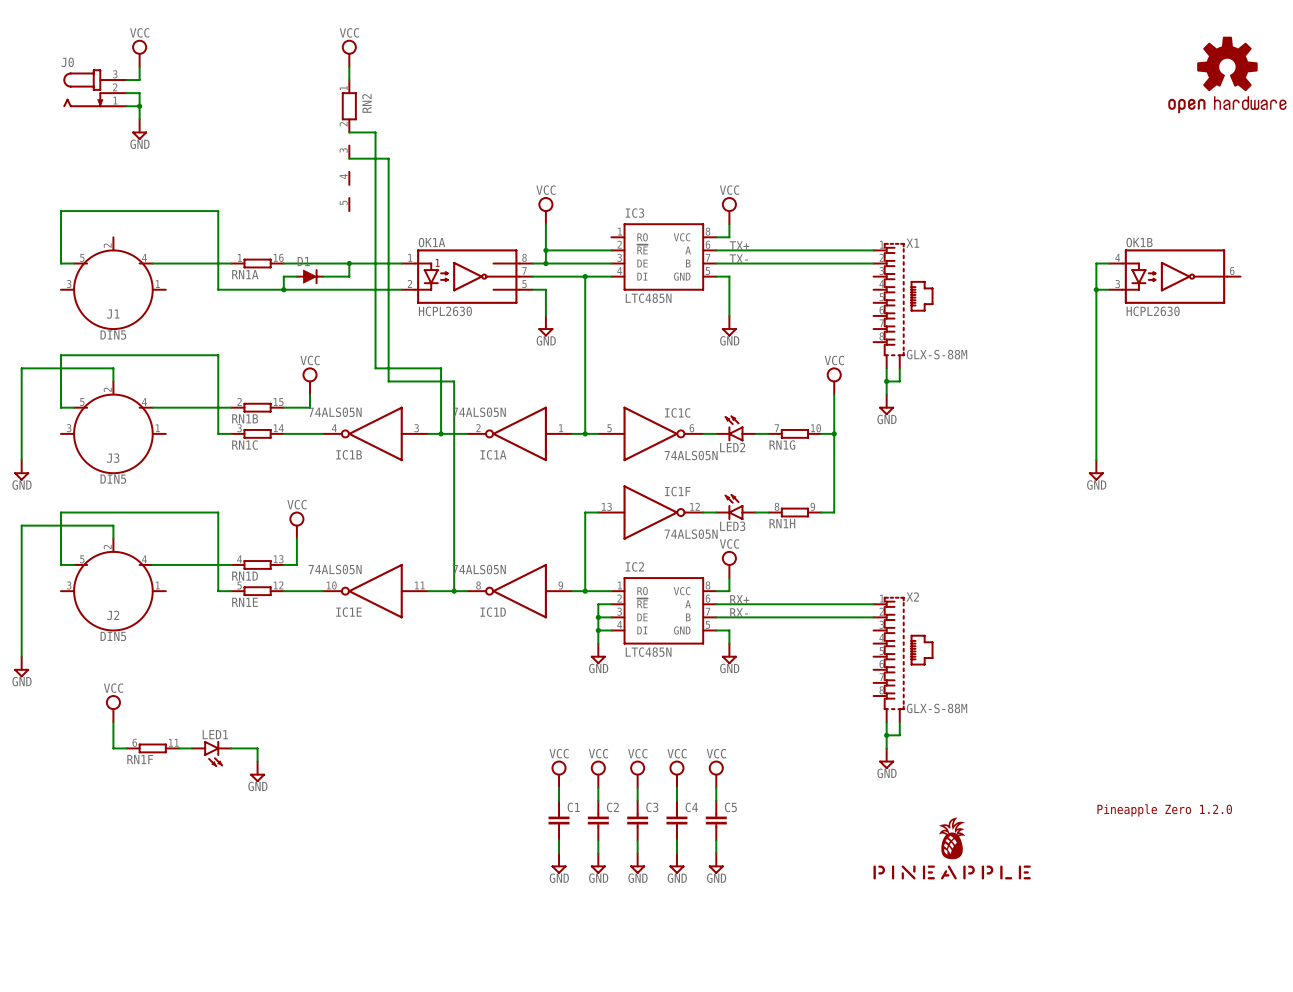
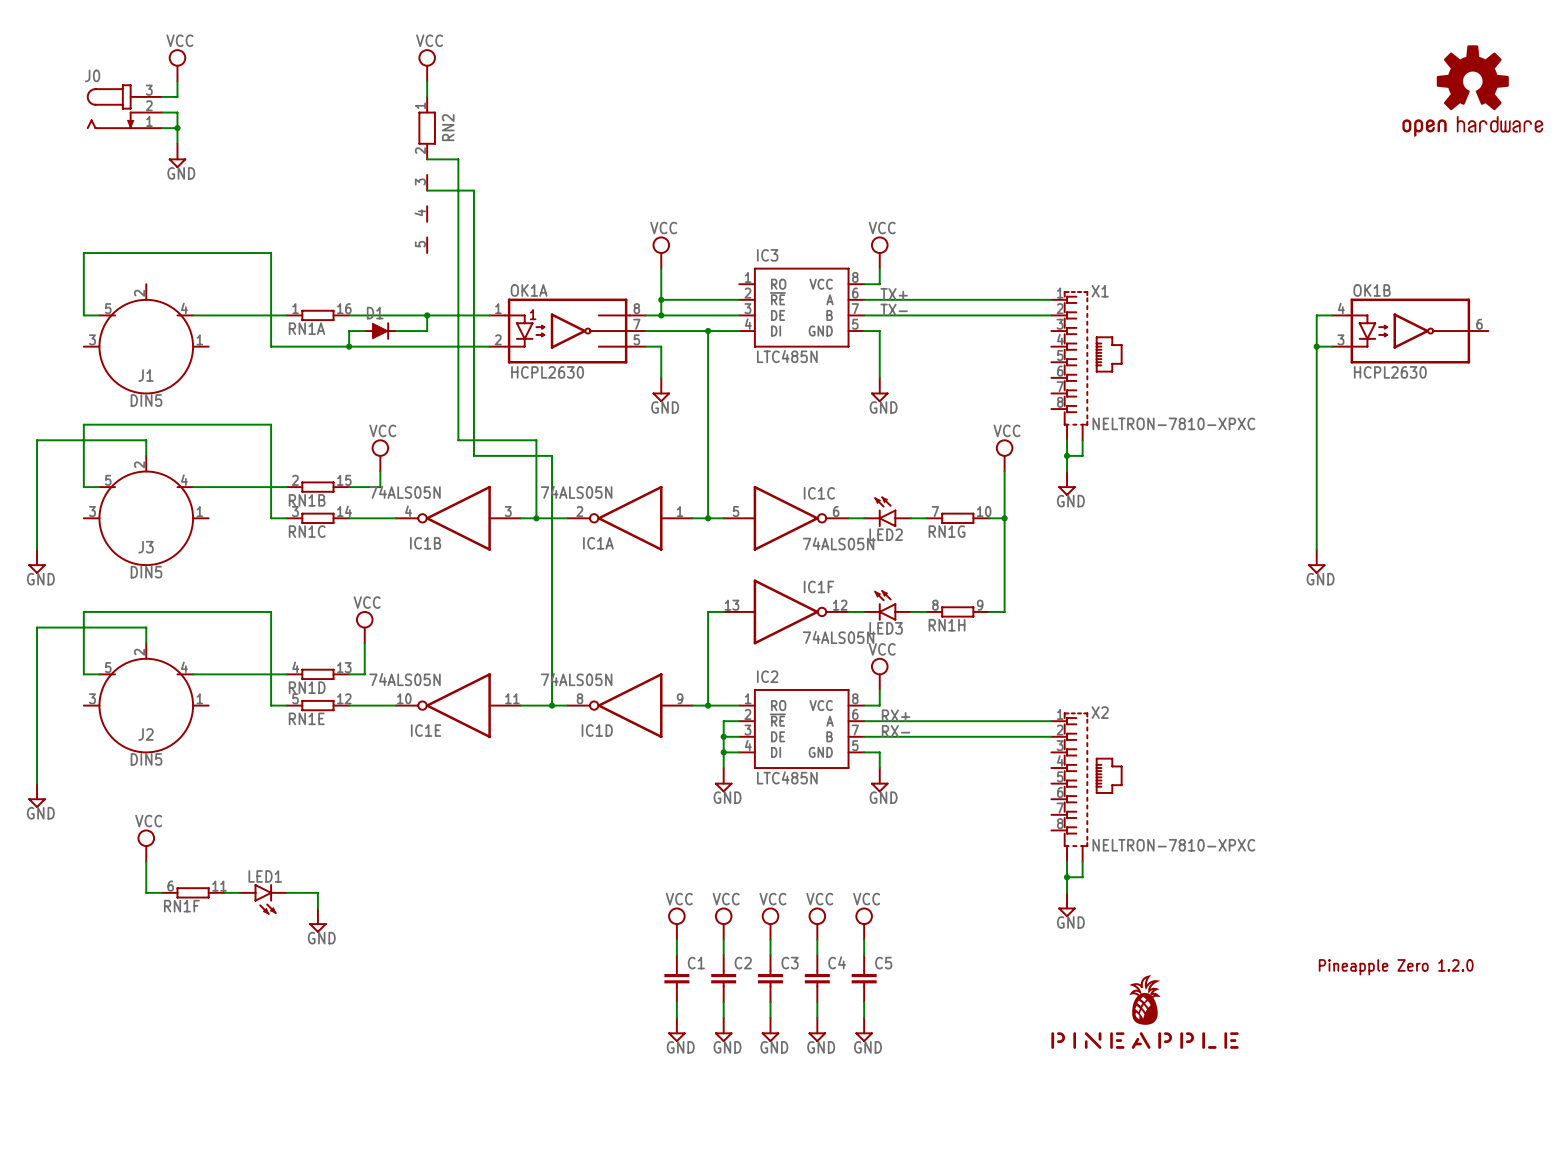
X1 value: GLX-S-88M (937, 354) -> NELTRON-7810-XPXC (1173, 423)
X2 value: GLX-S-88M (937, 708) -> NELTRON-7810-XPXC (1173, 845)

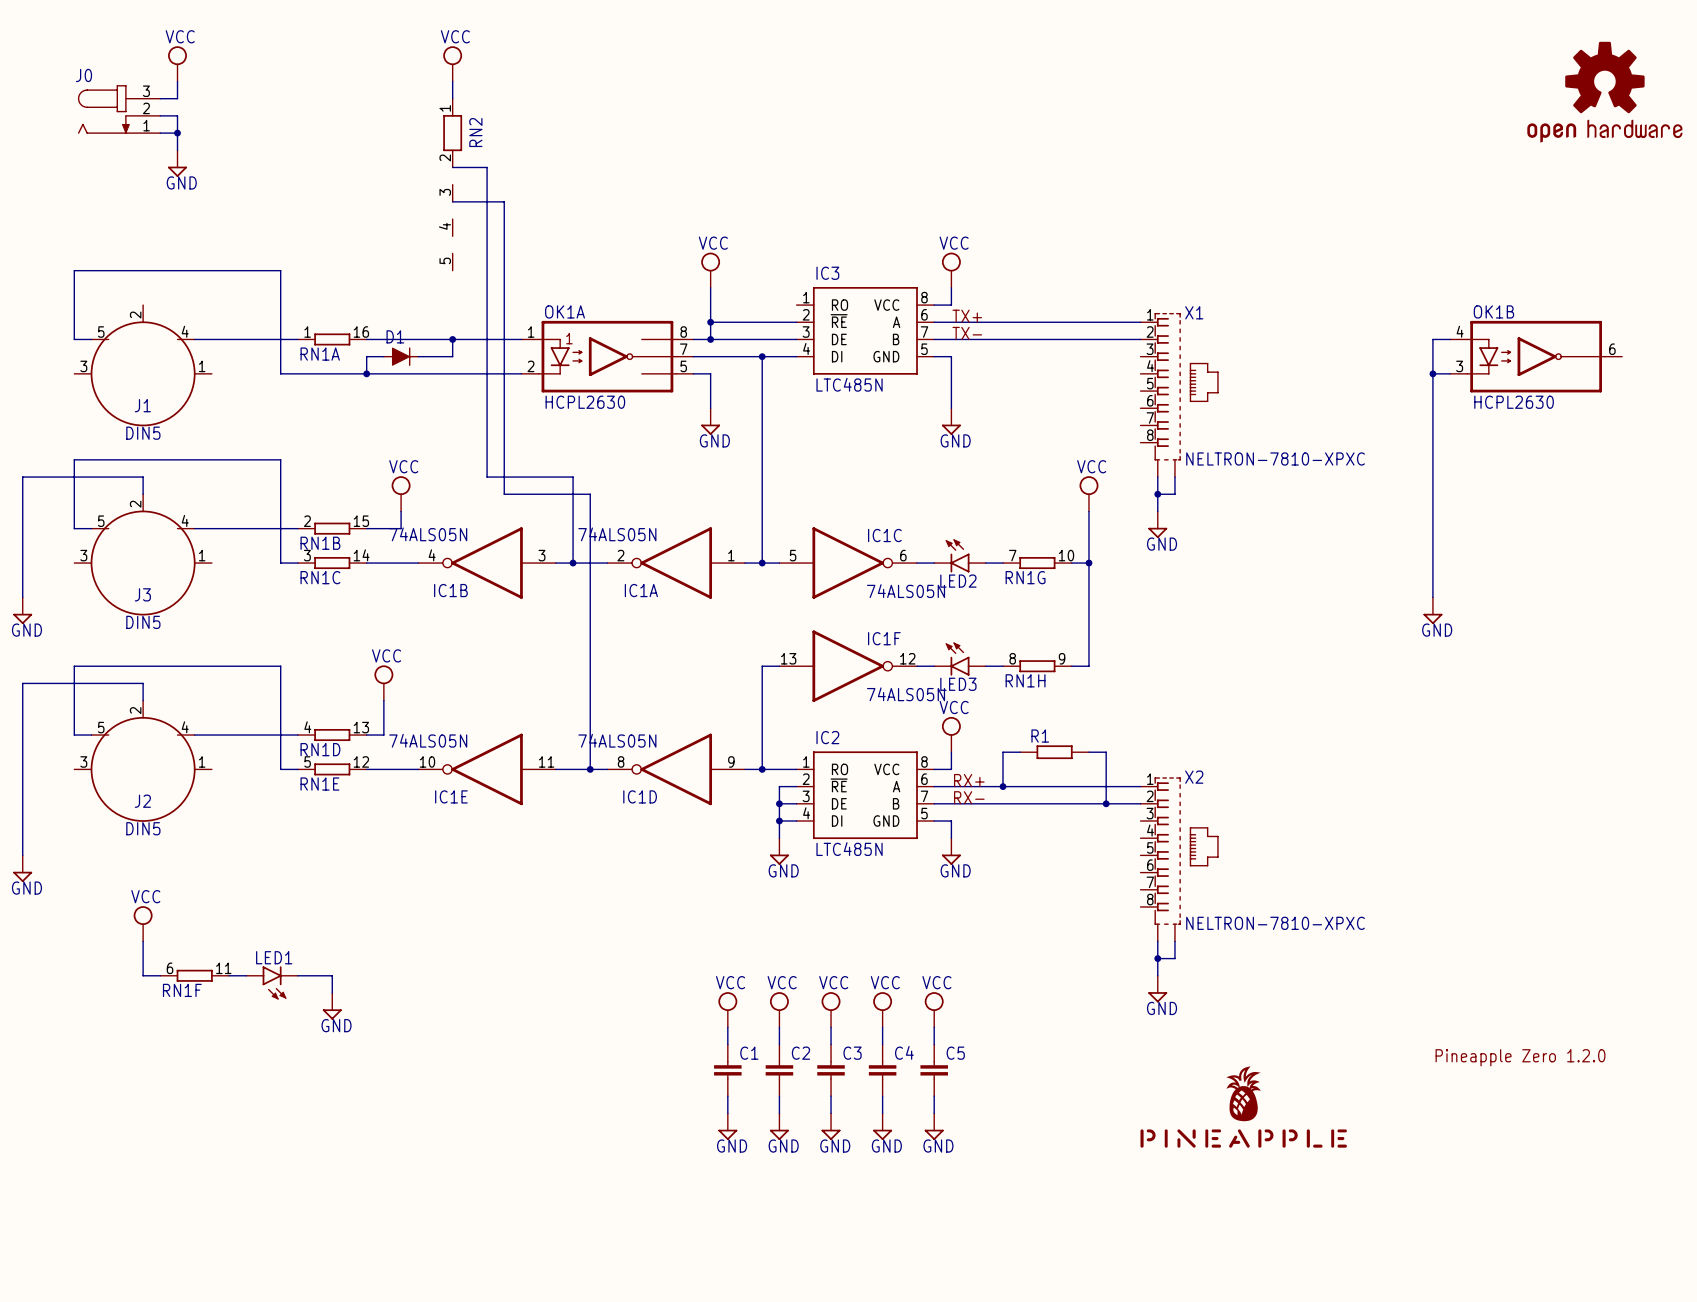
wire: none -> (1020, 752) (1002, 752) (1002, 786)
R1: none -> (1054, 752)
wire: none -> (1088, 752) (1106, 752) (1106, 803)
junction: none -> (1002, 786)
junction: none -> (1106, 803)

